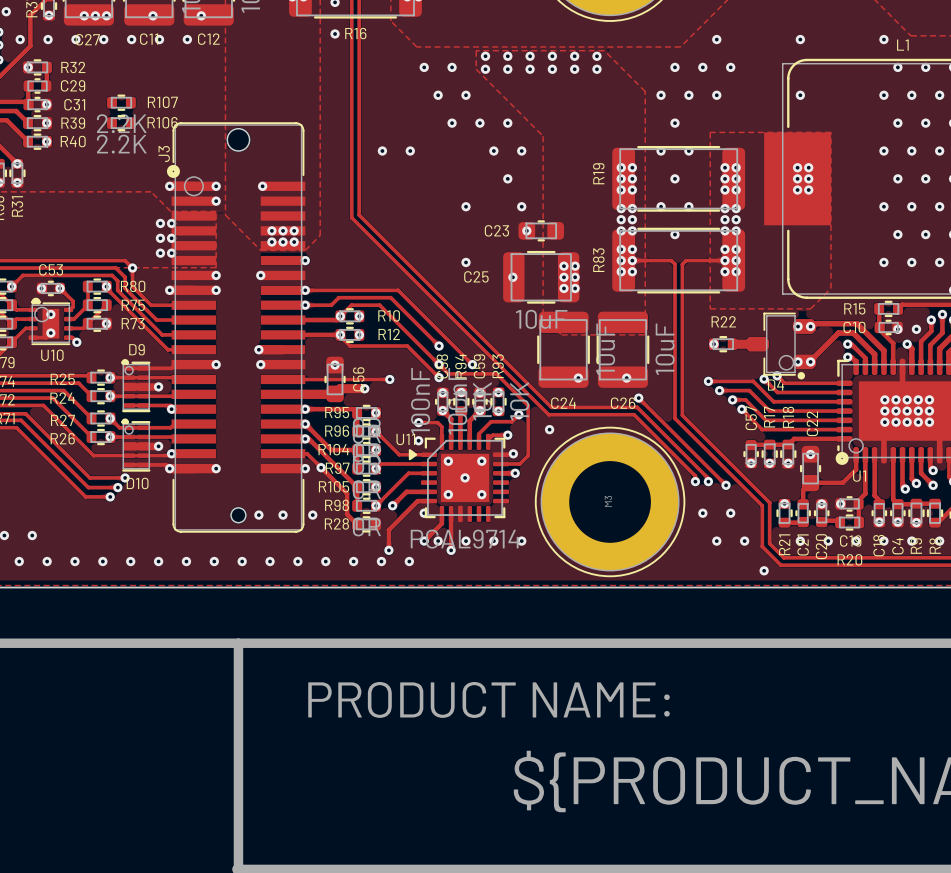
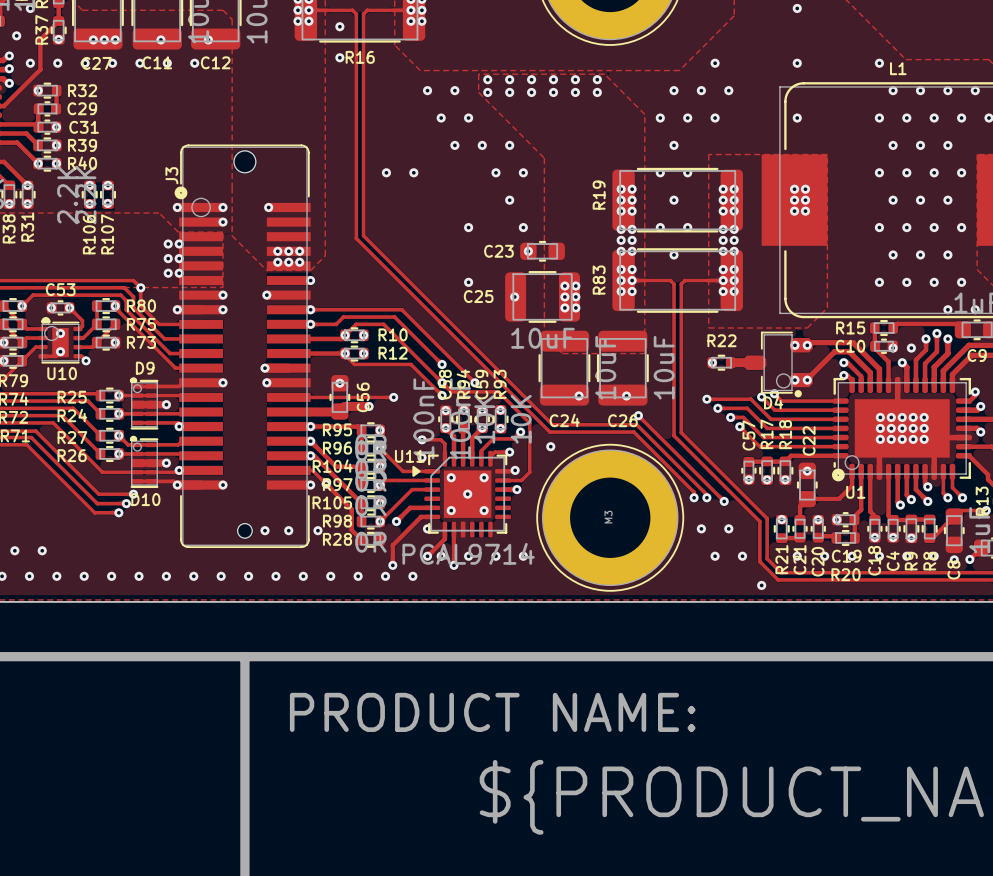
R107 rotation: 0° (121, 102) -> 90° clockwise (107, 194)
R107 position: (121, 102) -> (107, 194)
R106 rotation: 0° (121, 123) -> 90° clockwise (89, 194)
R106 position: (121, 123) -> (89, 194)
via: none -> (38, 163)
via: none -> (89, 185)
via: none -> (107, 185)
via: none -> (89, 204)
via: none -> (107, 203)

